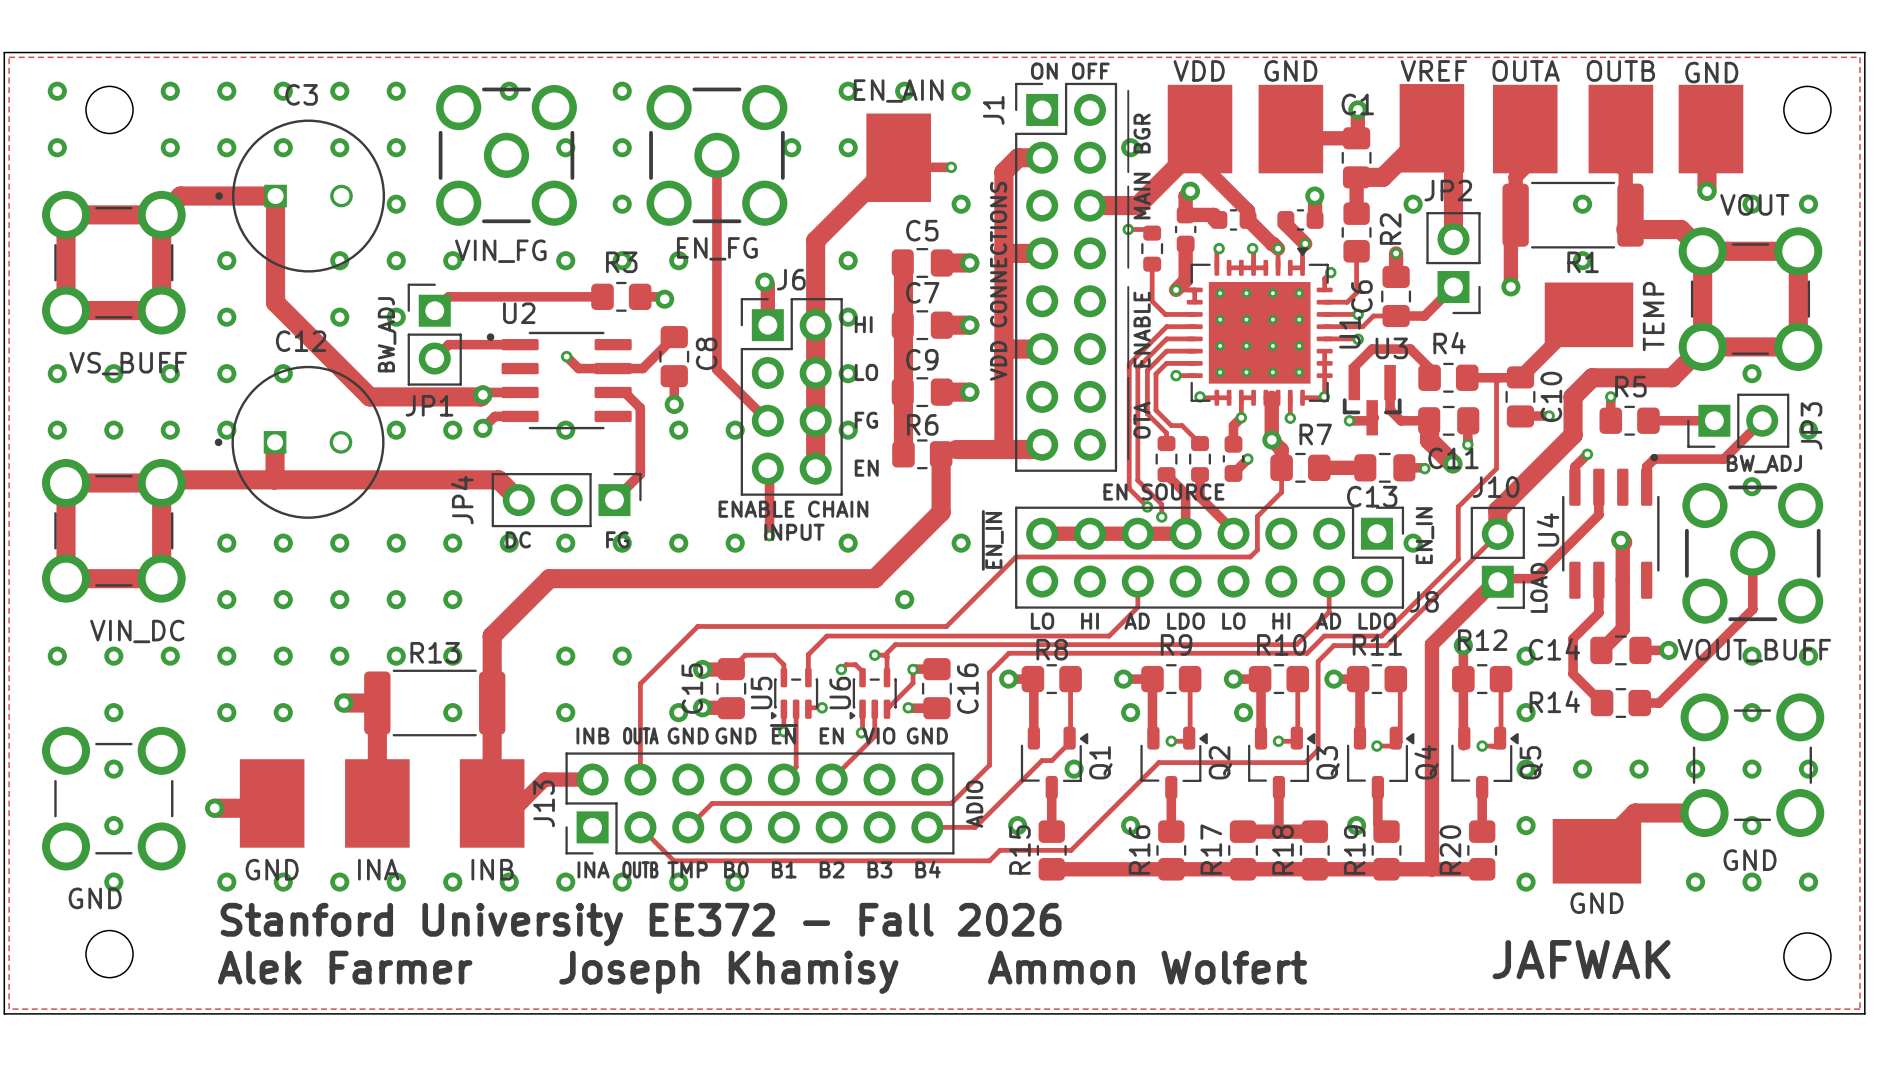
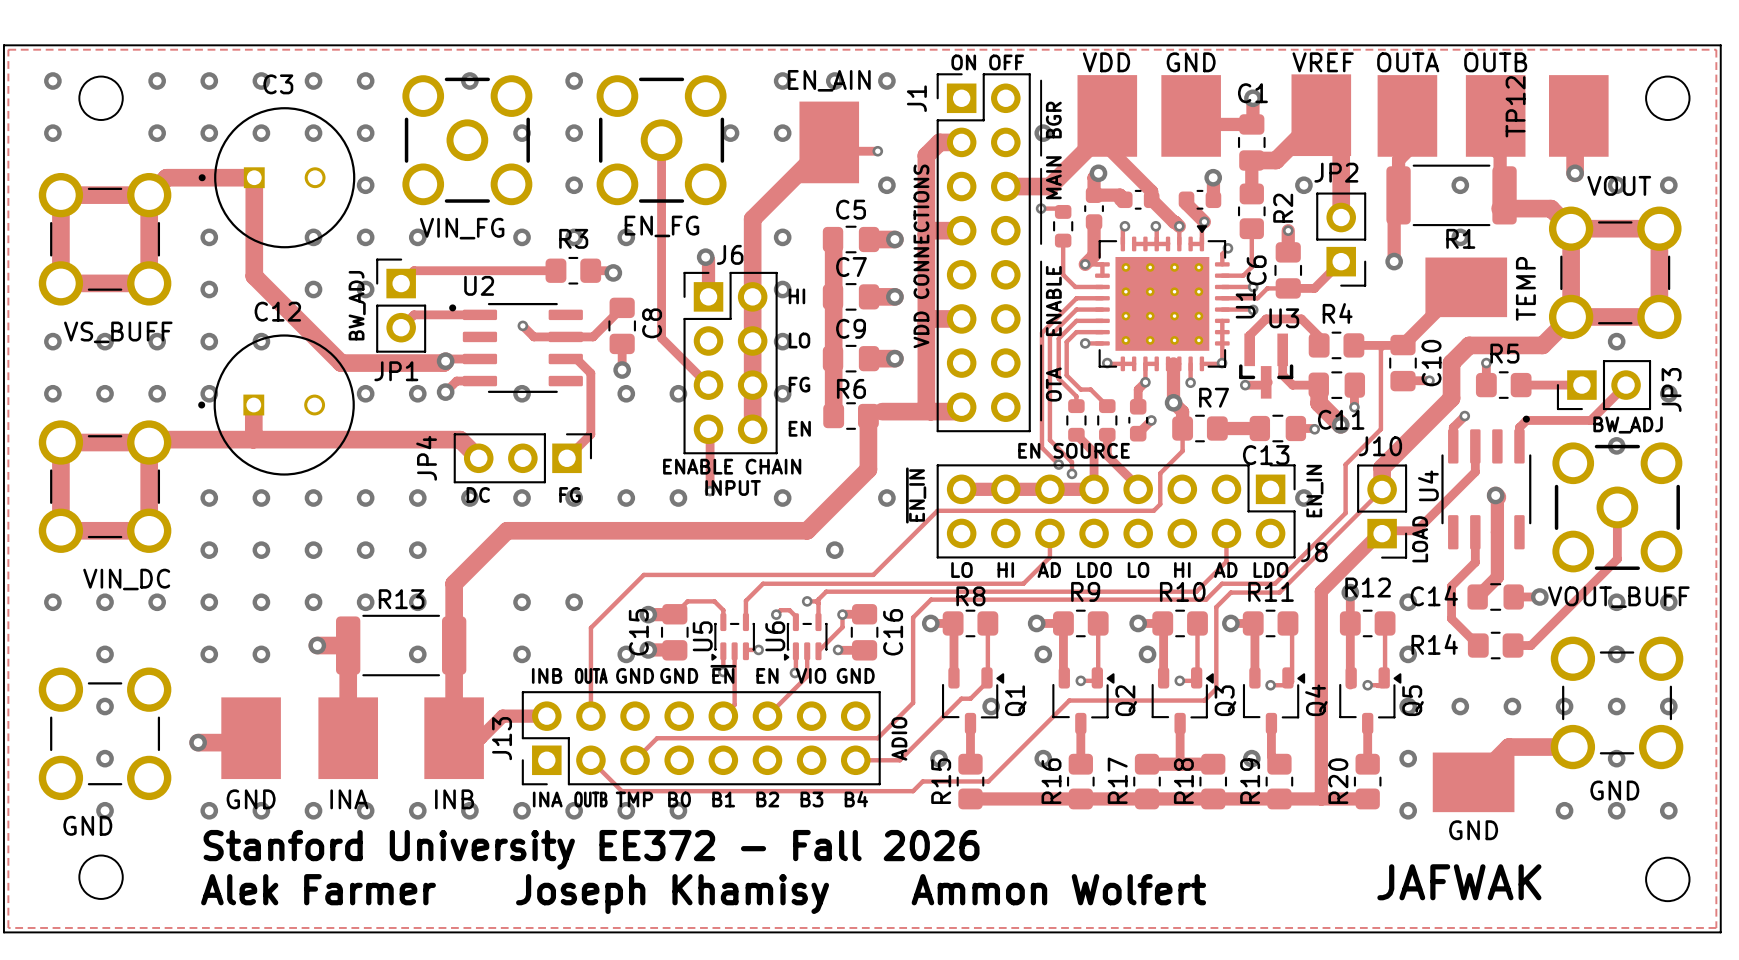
TP12 value: GND (1711, 72) -> none
TP12 name: none -> TP12 (1515, 106)

